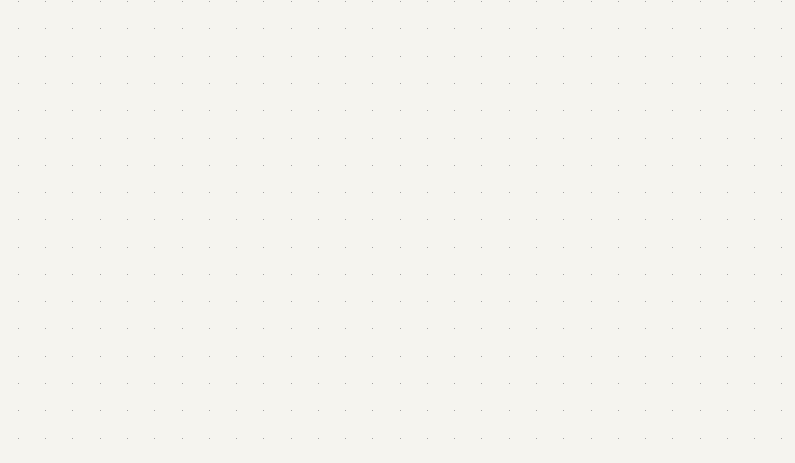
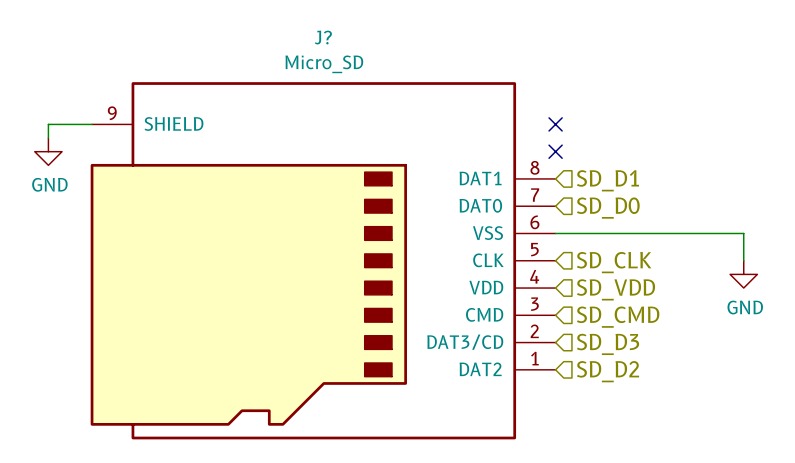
wire: none -> (92, 124) (48, 124) (48, 138)
no-connect mark: none -> (555, 124)
power symbol: none -> GND (48, 151)
no-connect mark: none -> (555, 151)
hierarchical label: none -> SD_D1 (607, 180)
hierarchical label: none -> SD_D0 (608, 208)
wire: none -> (555, 233) (743, 233) (743, 260)
J?: none -> Micro_SD (323, 260)
hierarchical label: none -> SD_CLK (614, 262)
power symbol: none -> GND (743, 274)
hierarchical label: none -> SD_VDD (615, 289)
hierarchical label: none -> SD_CMD (618, 317)
hierarchical label: none -> SD_D3 (608, 344)
hierarchical label: none -> SD_D2 (608, 371)

